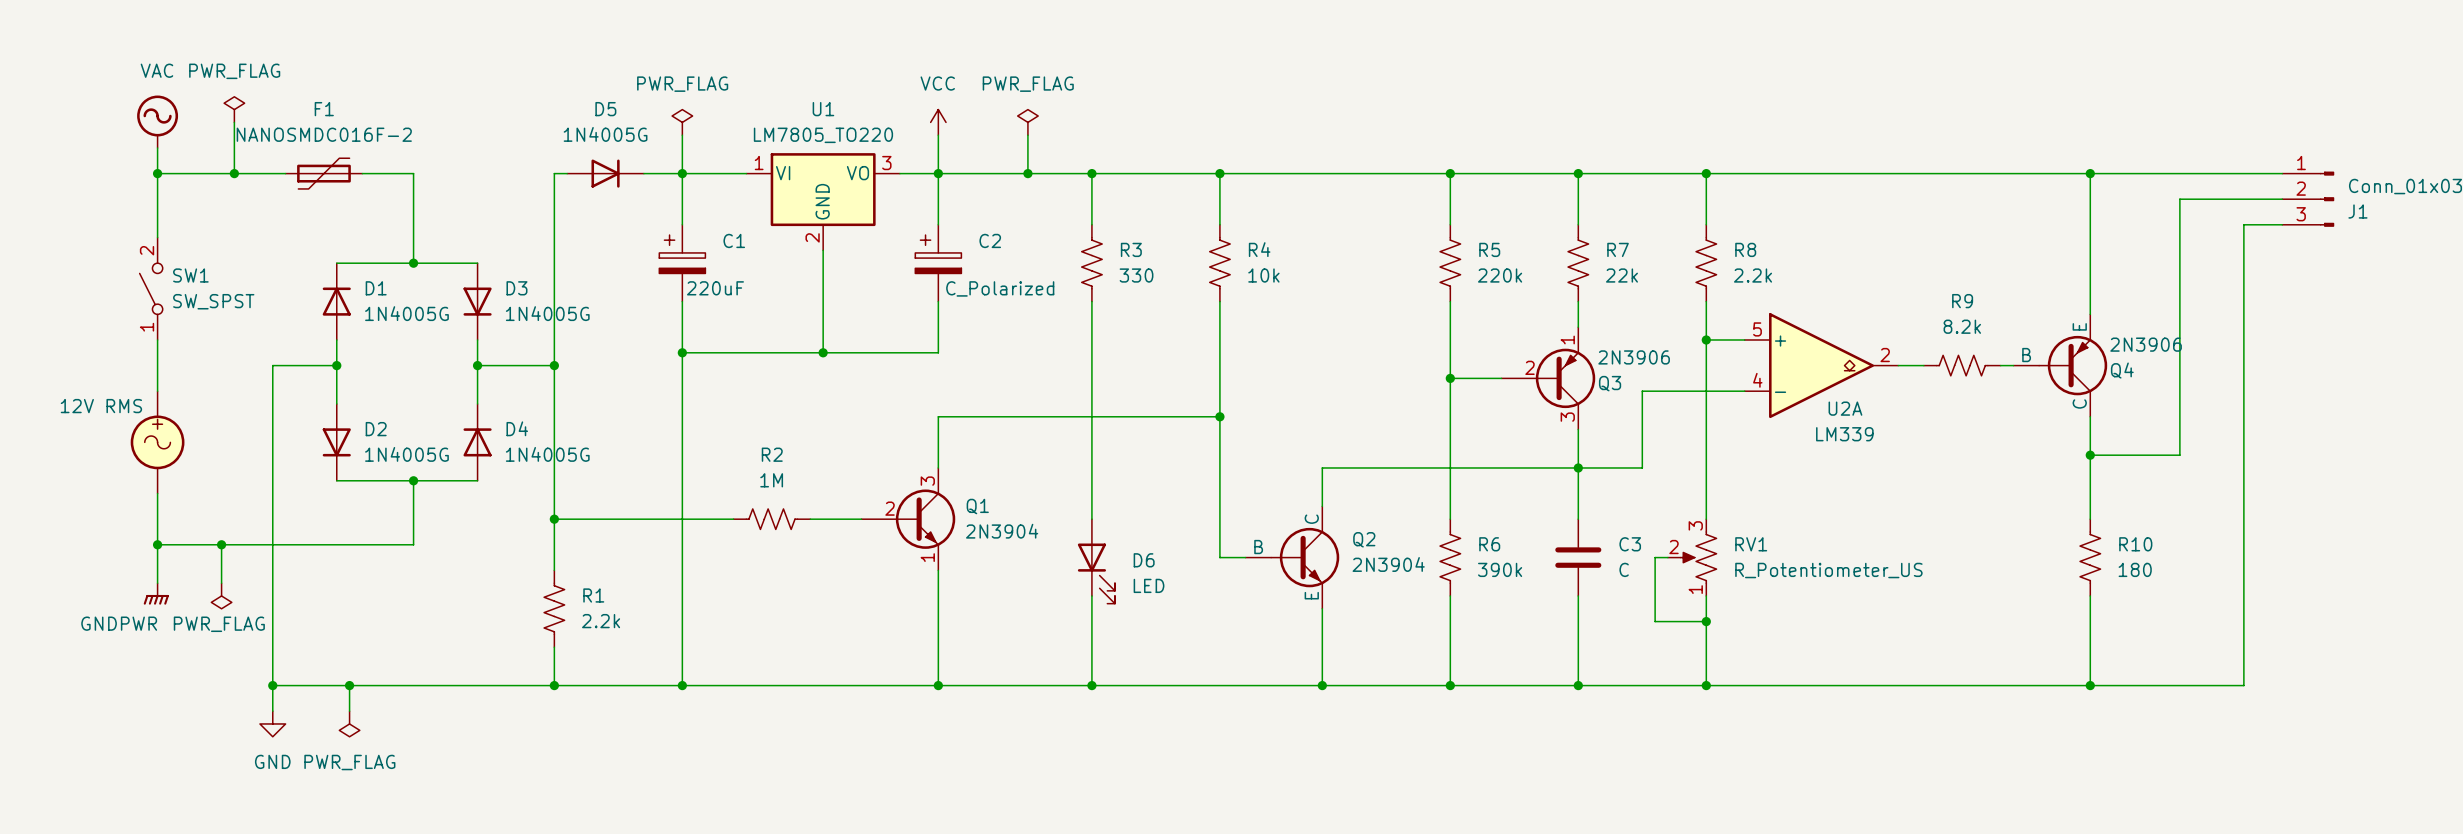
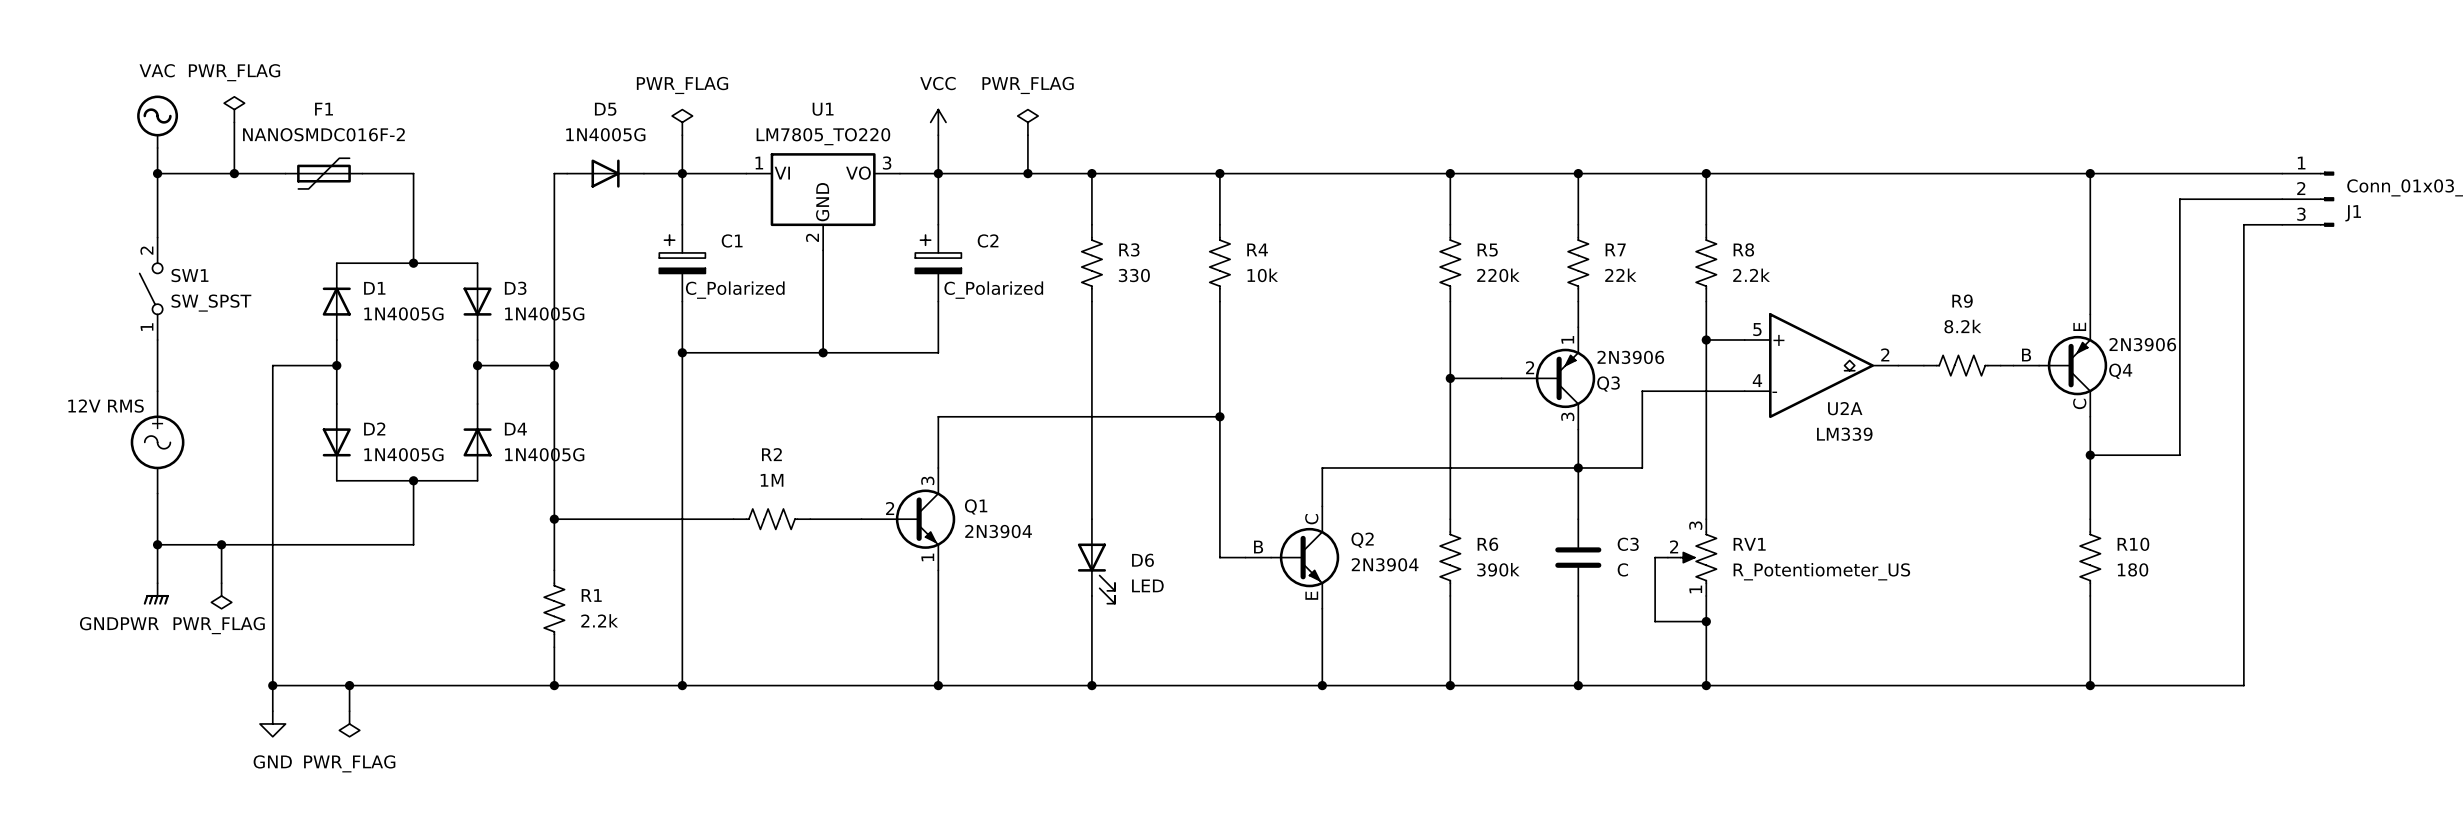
C1 value: 220uF (715, 288) -> C_Polarized (735, 290)

